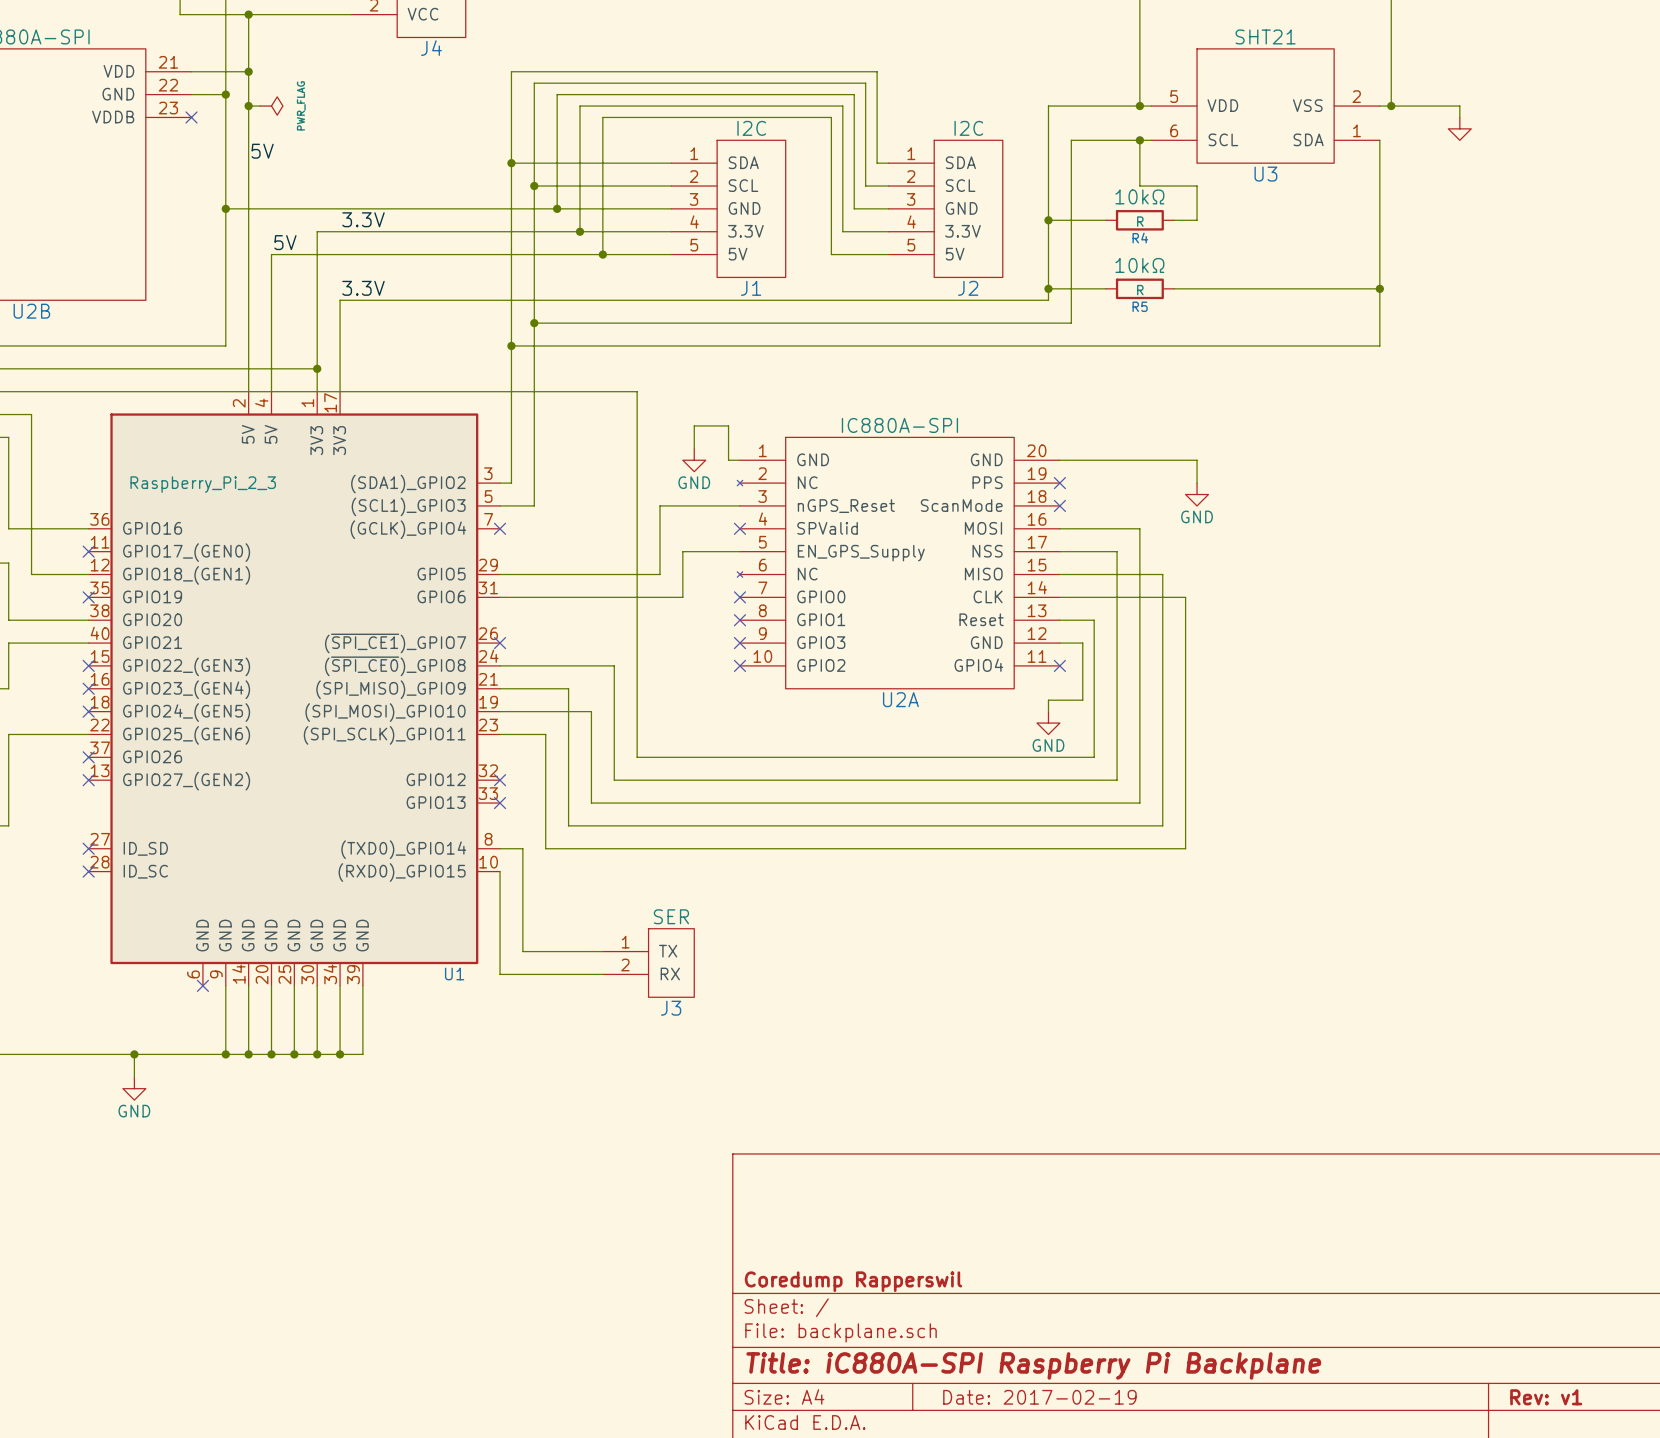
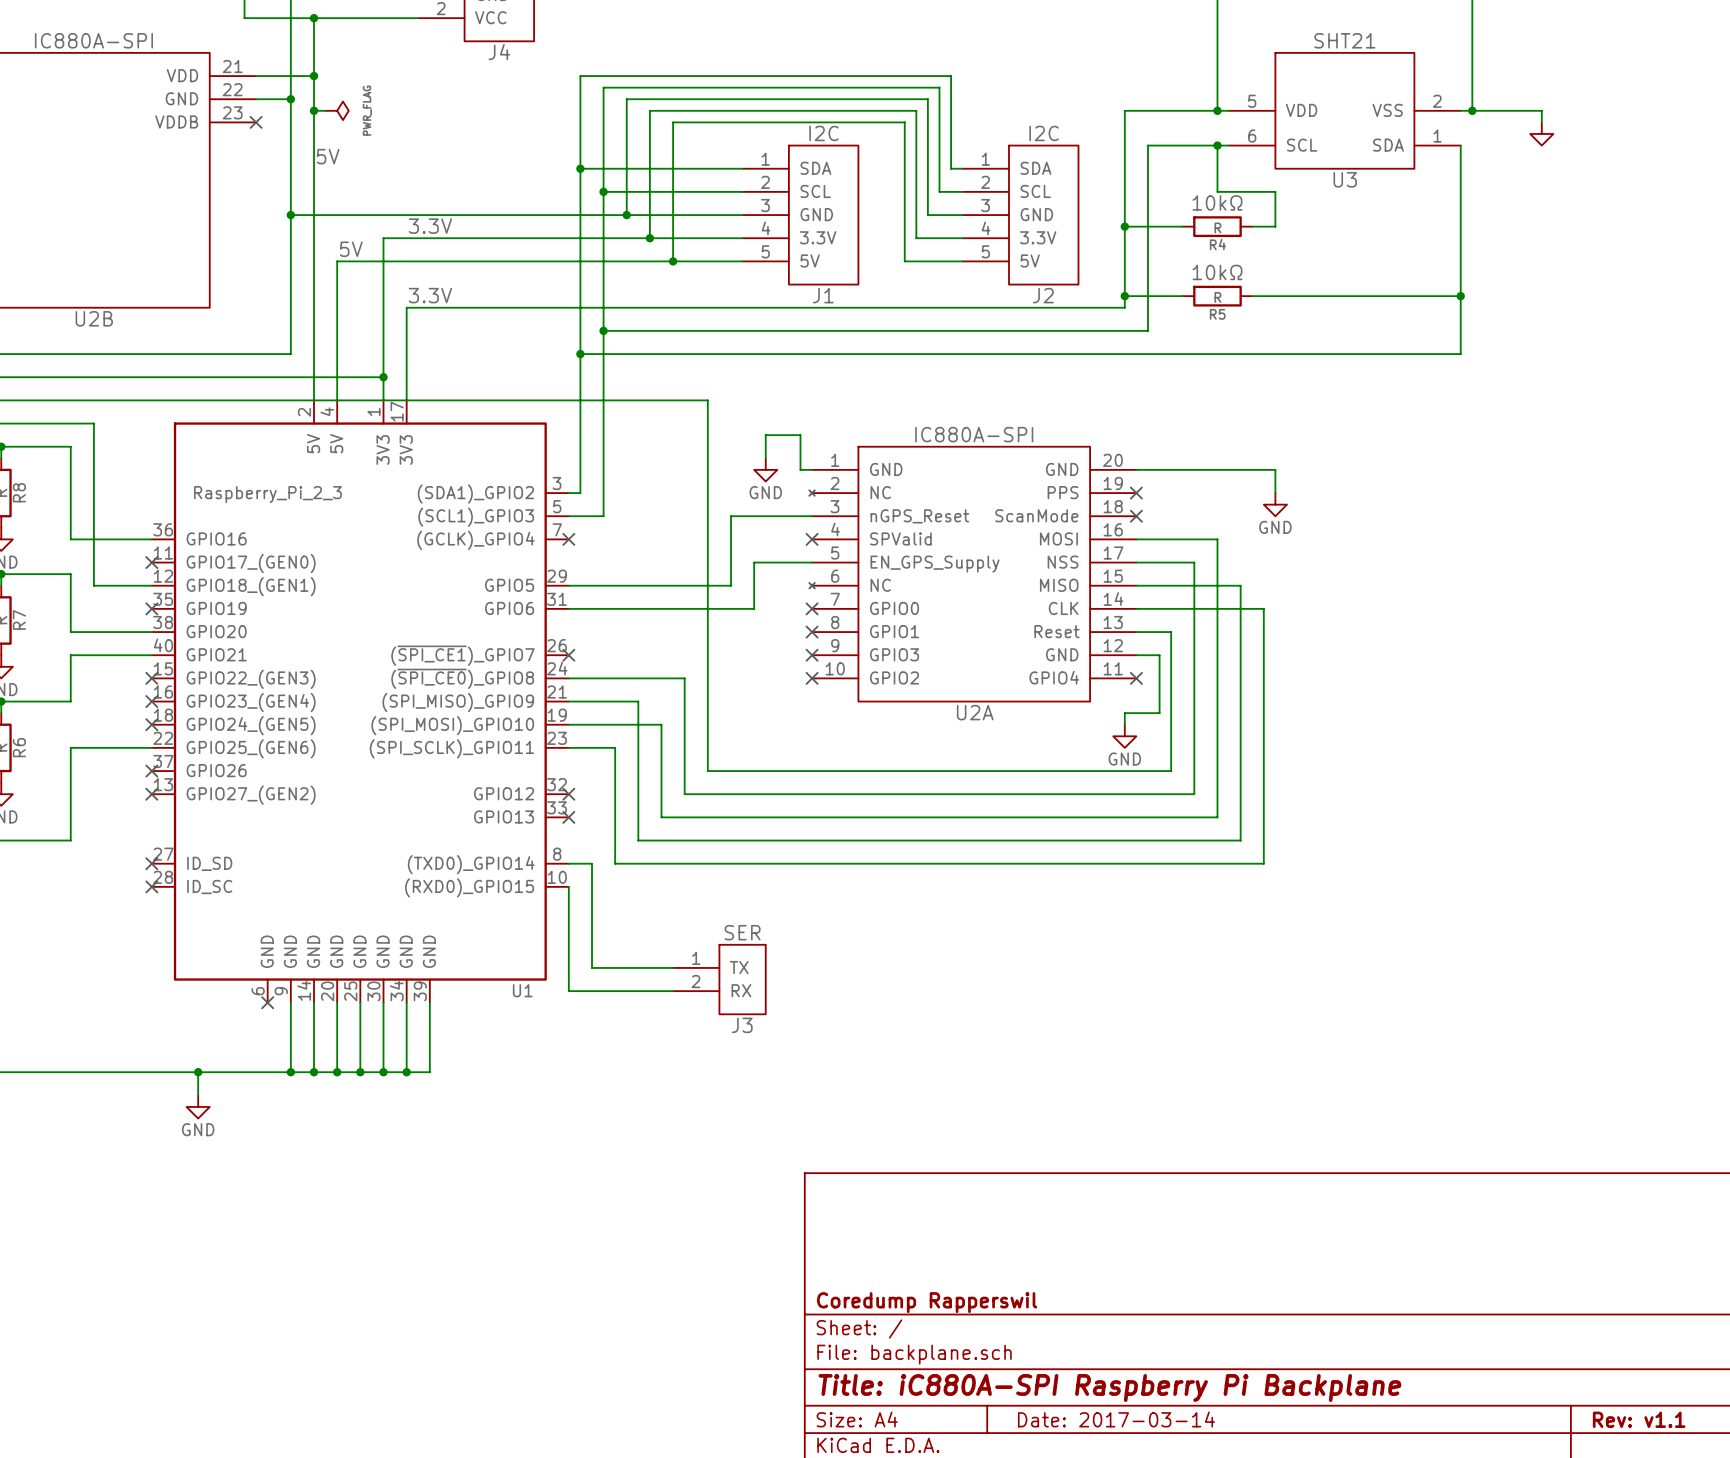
title block: Date: 2017-02-19 (1039, 1397) -> Date: 2017-03-14 (1116, 1419)
title block: Rev: v1 (1546, 1397) -> Rev: v1.1 (1639, 1419)

